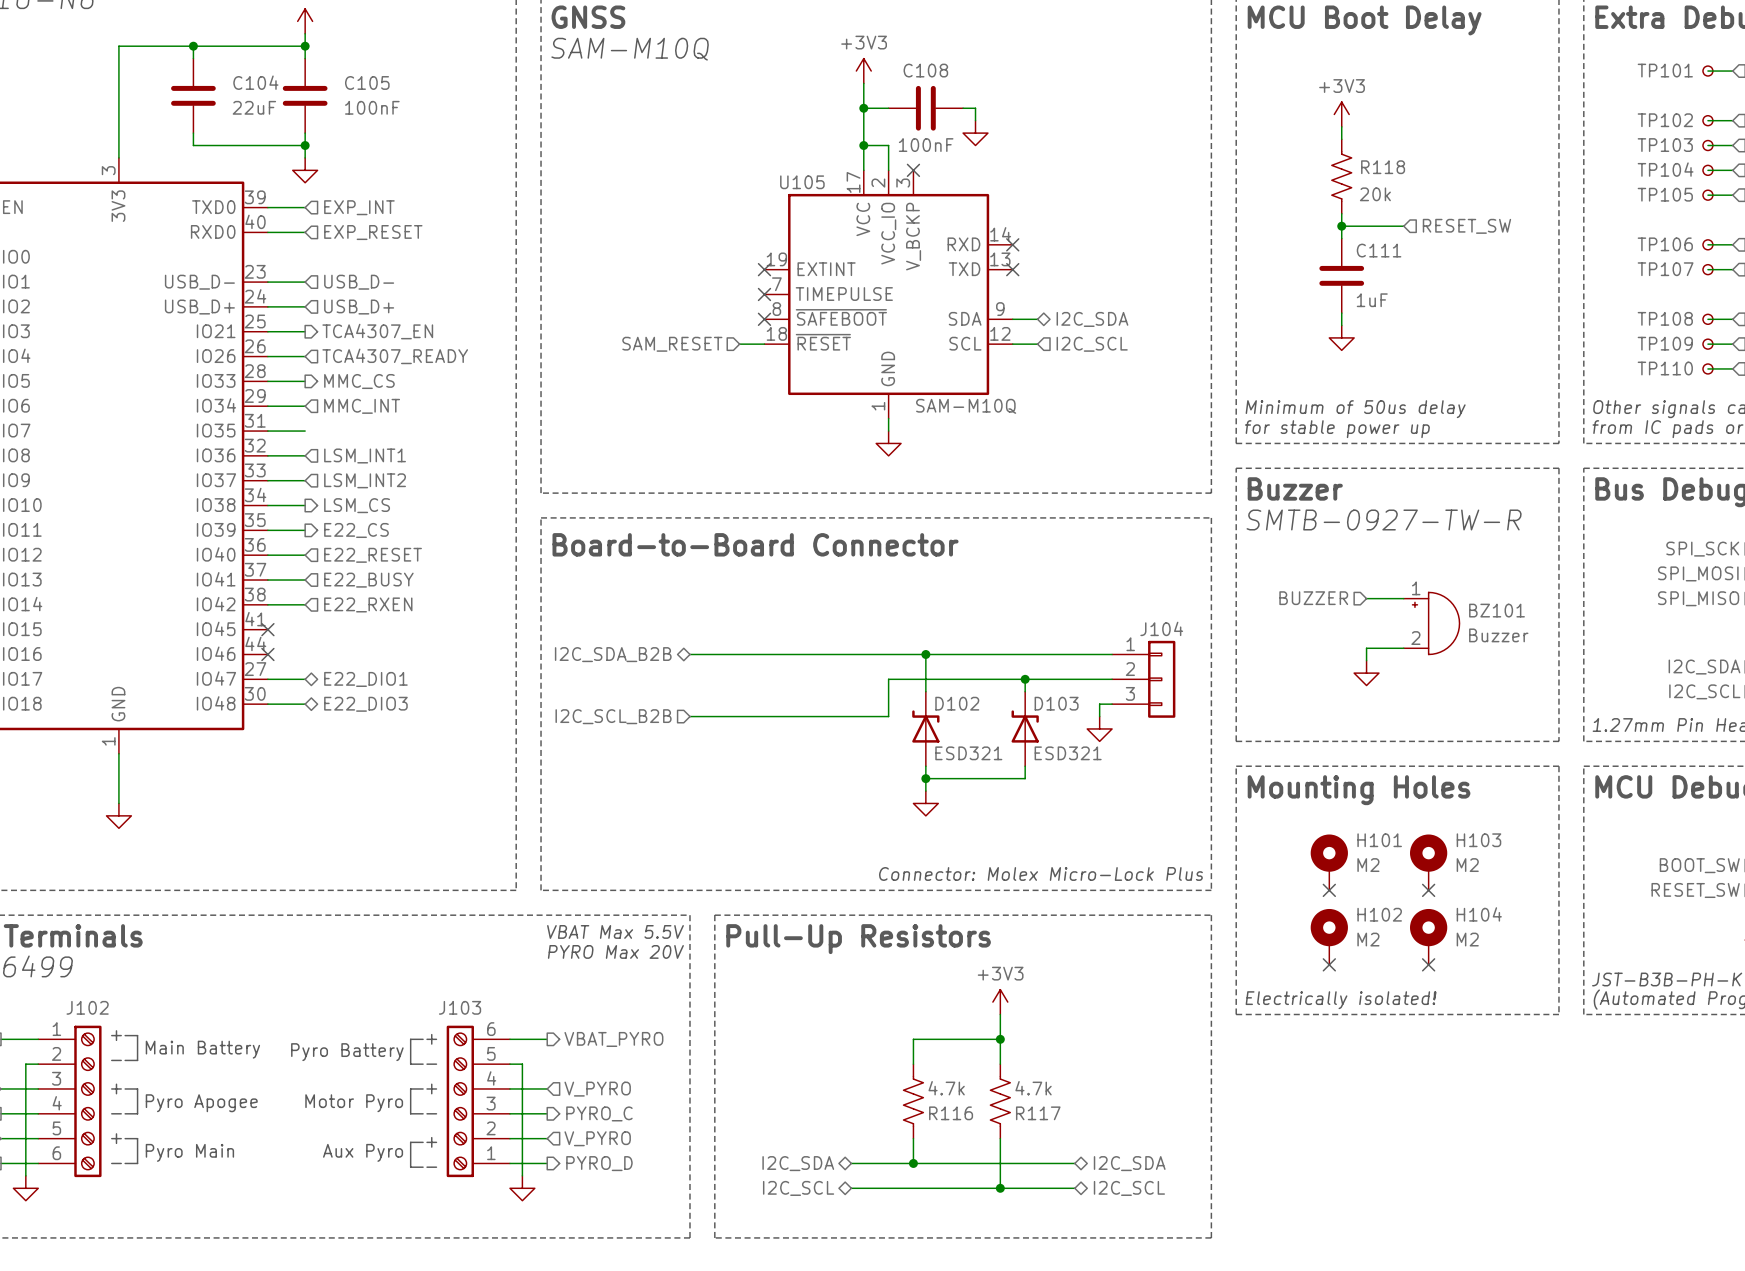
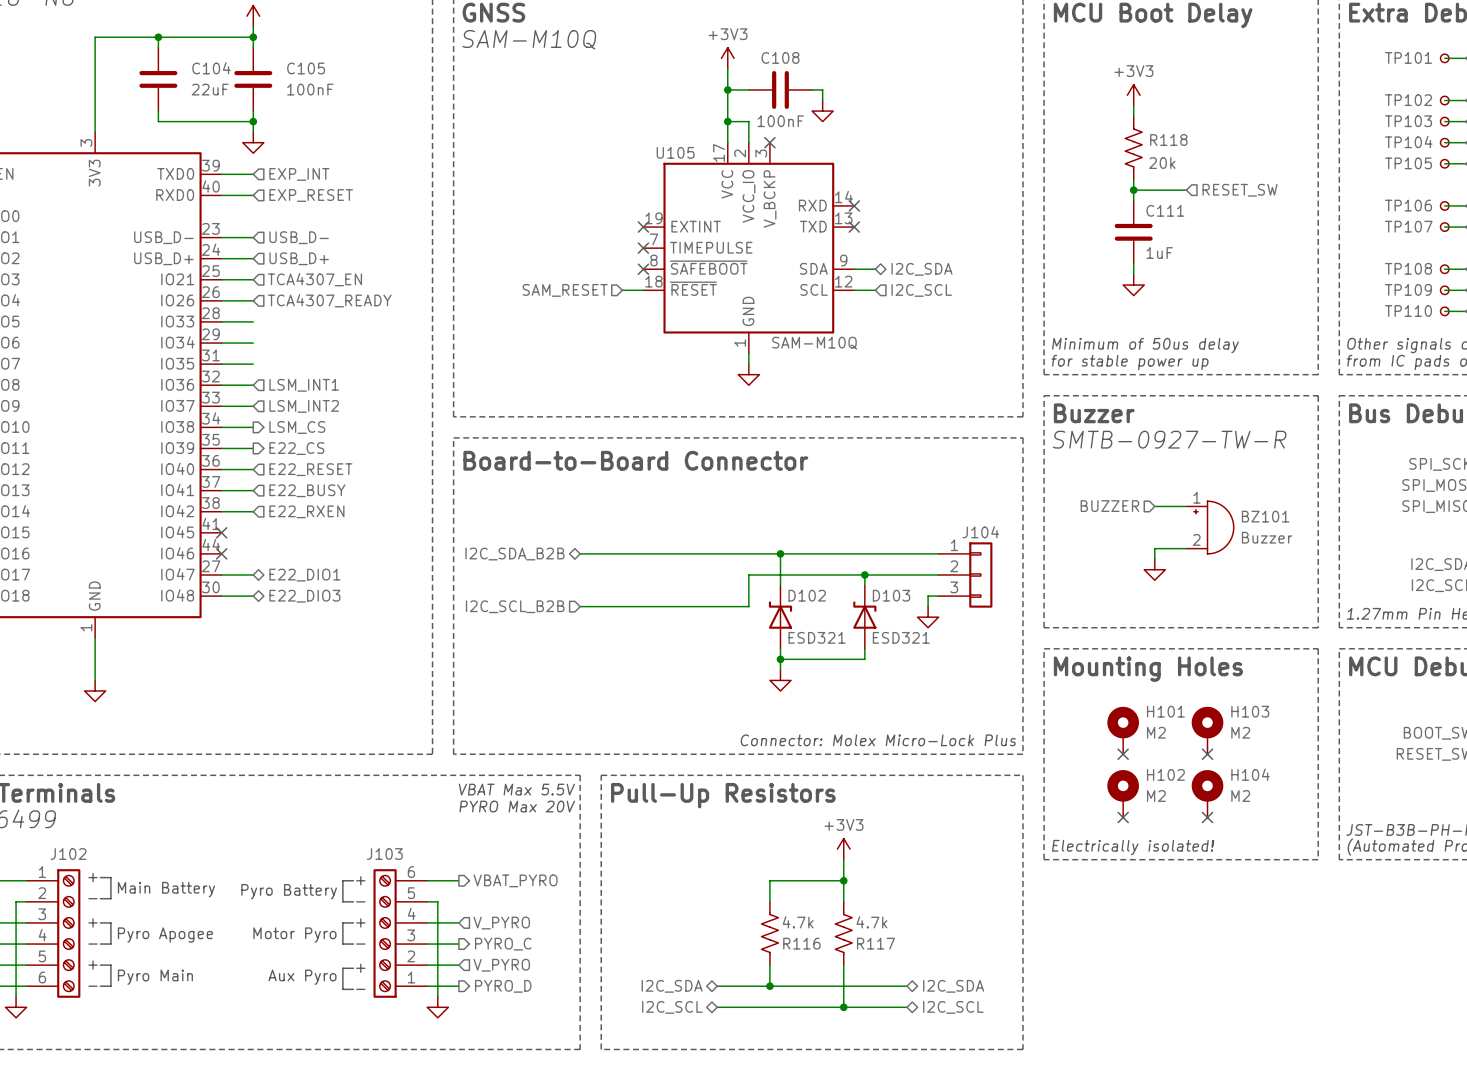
hierarchical label shape: output (377, 331) -> input (314, 279)
hierarchical label: MMC_CS (359, 381) -> none
hierarchical label: MMC_INT (362, 406) -> none

